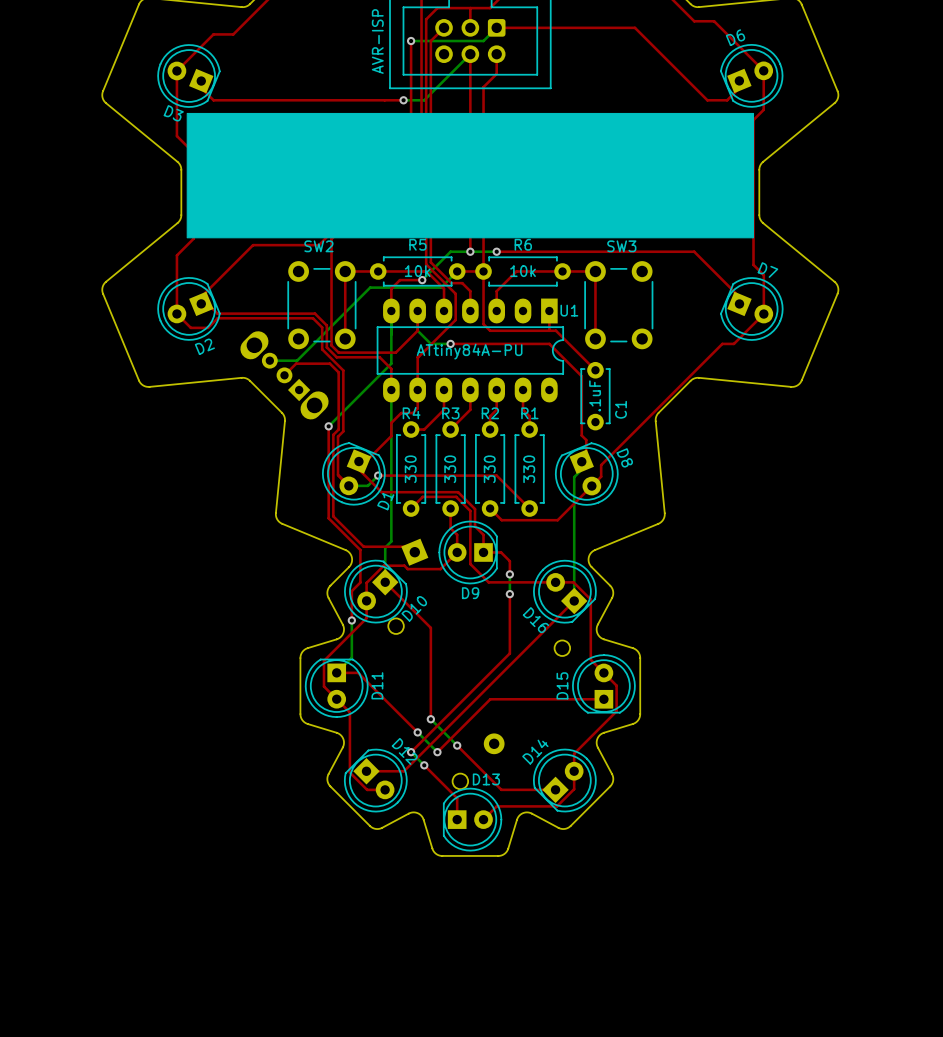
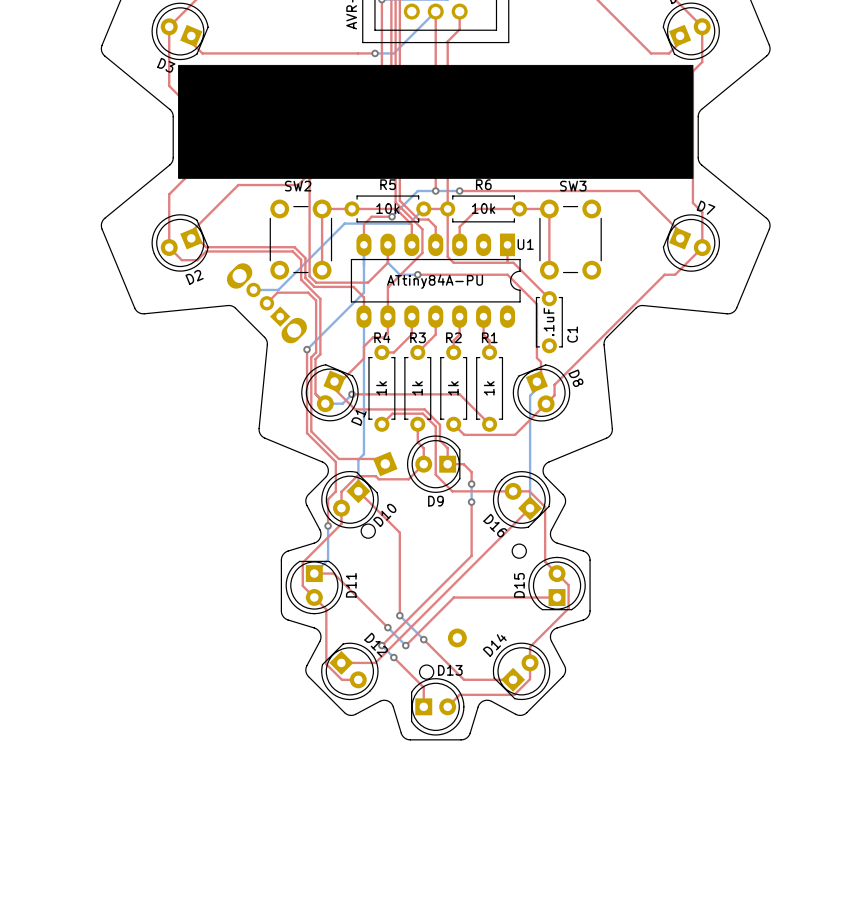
R4 value: 330 (410, 469) -> 1k (381, 388)
R3 value: 330 (450, 469) -> 1k (417, 388)
R2 value: 330 (489, 469) -> 1k (453, 388)
R1 value: 330 (529, 469) -> 1k (489, 388)

